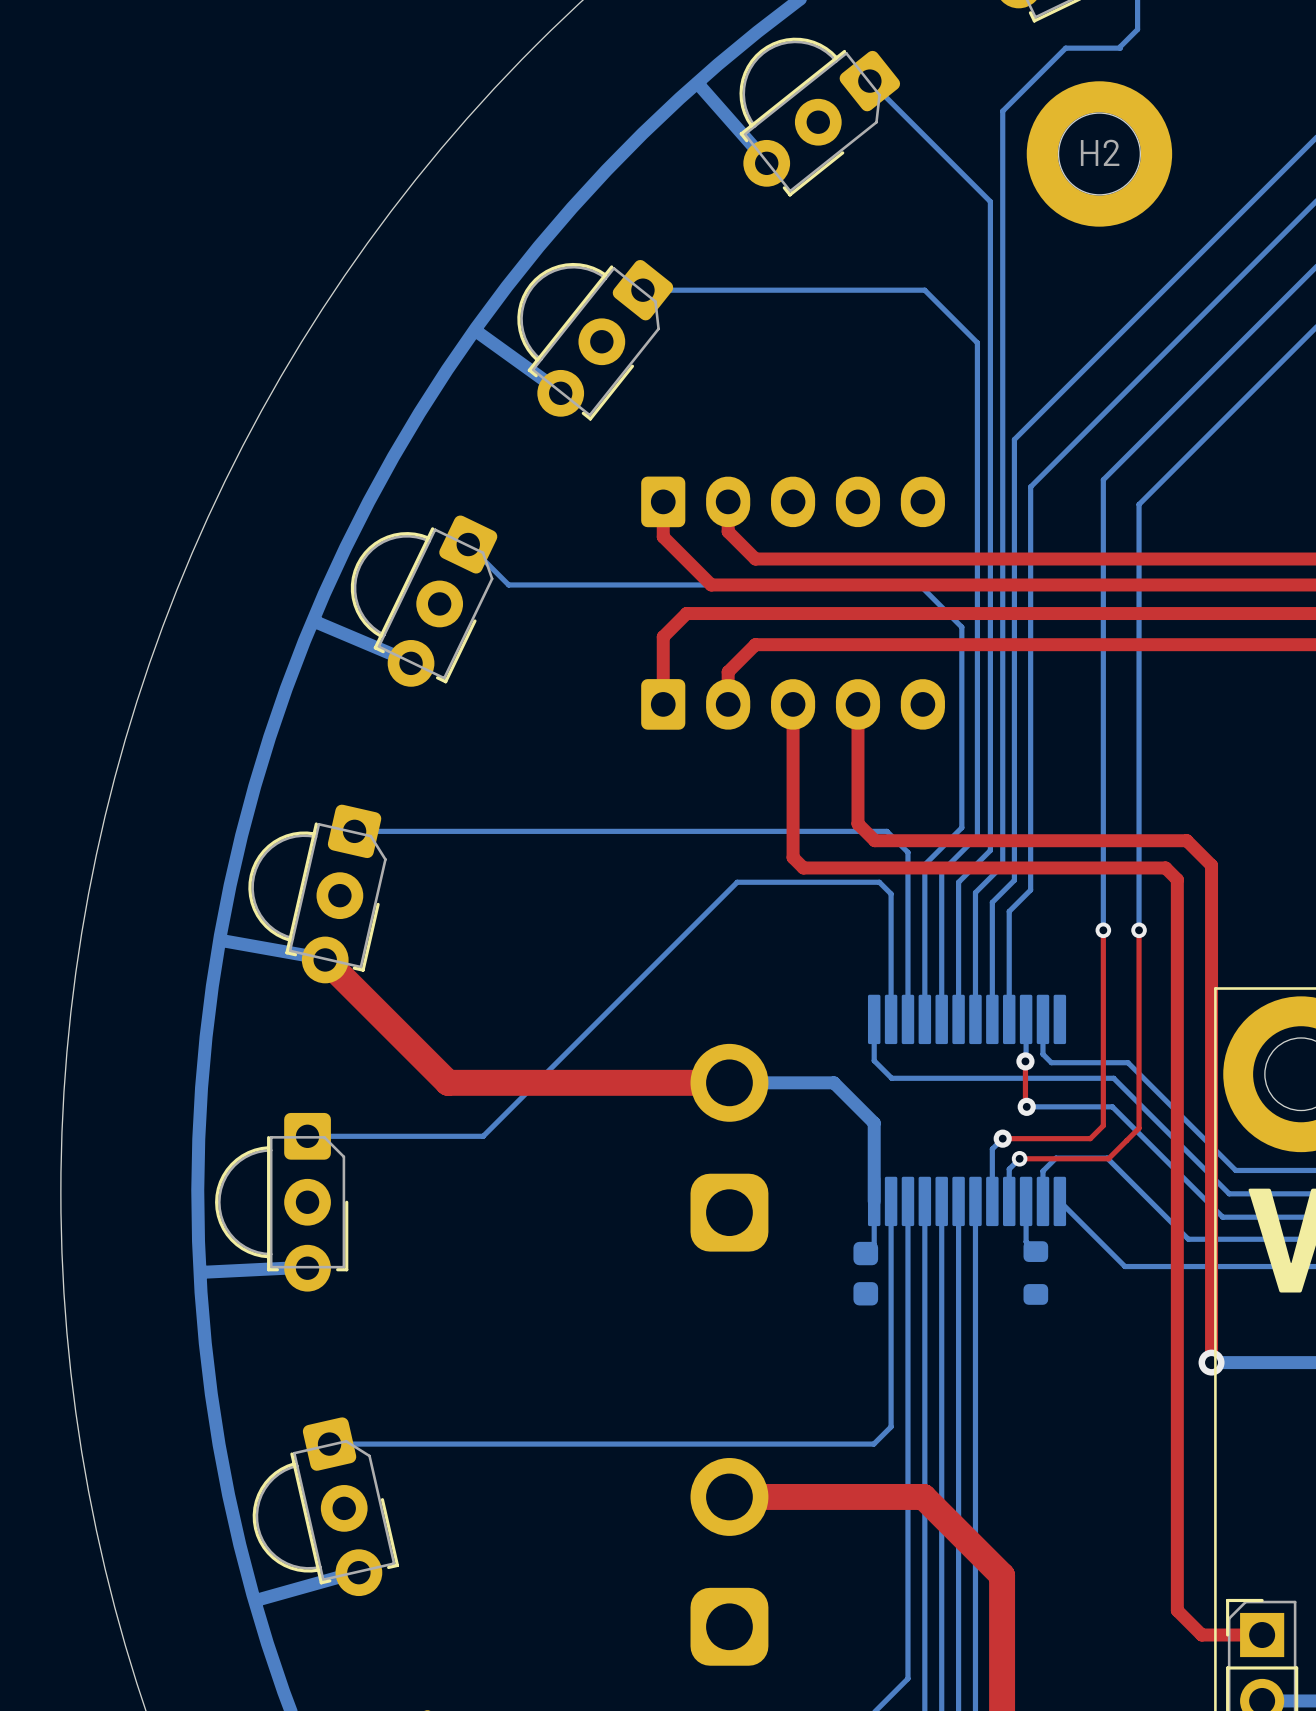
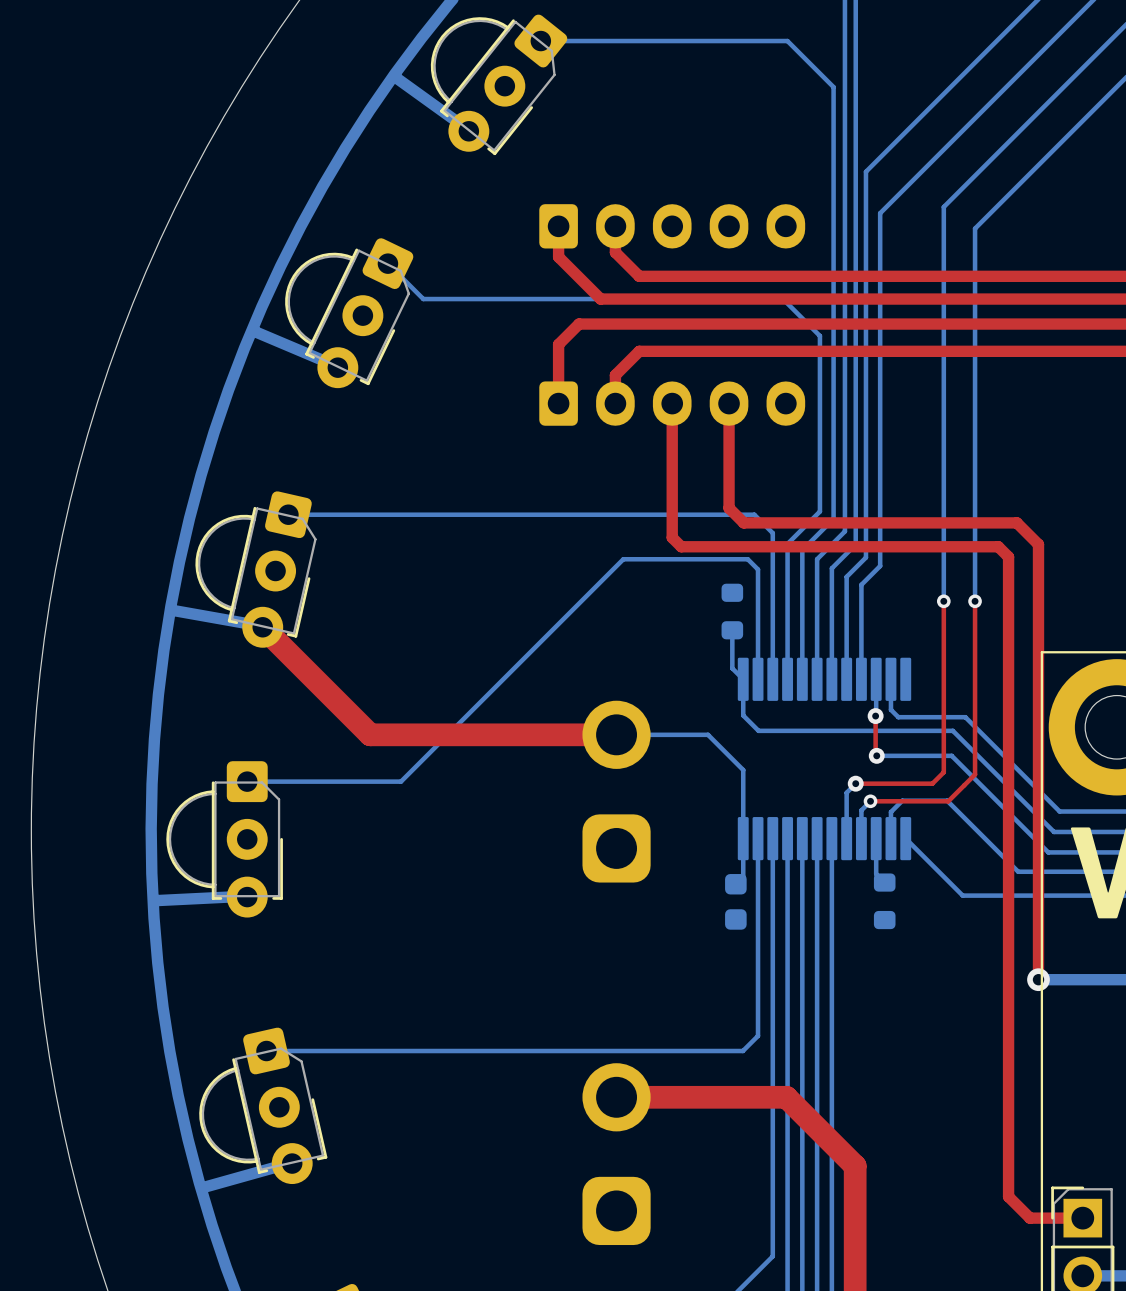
part: none -> (732, 611)
bottom track: none -> (732, 630) (732, 668) (743, 679)
bottom track width: thick (729, 1082) (833, 1082) (874, 1123) (874, 1201) -> thin (616, 734) (708, 734) (743, 770) (743, 838)

